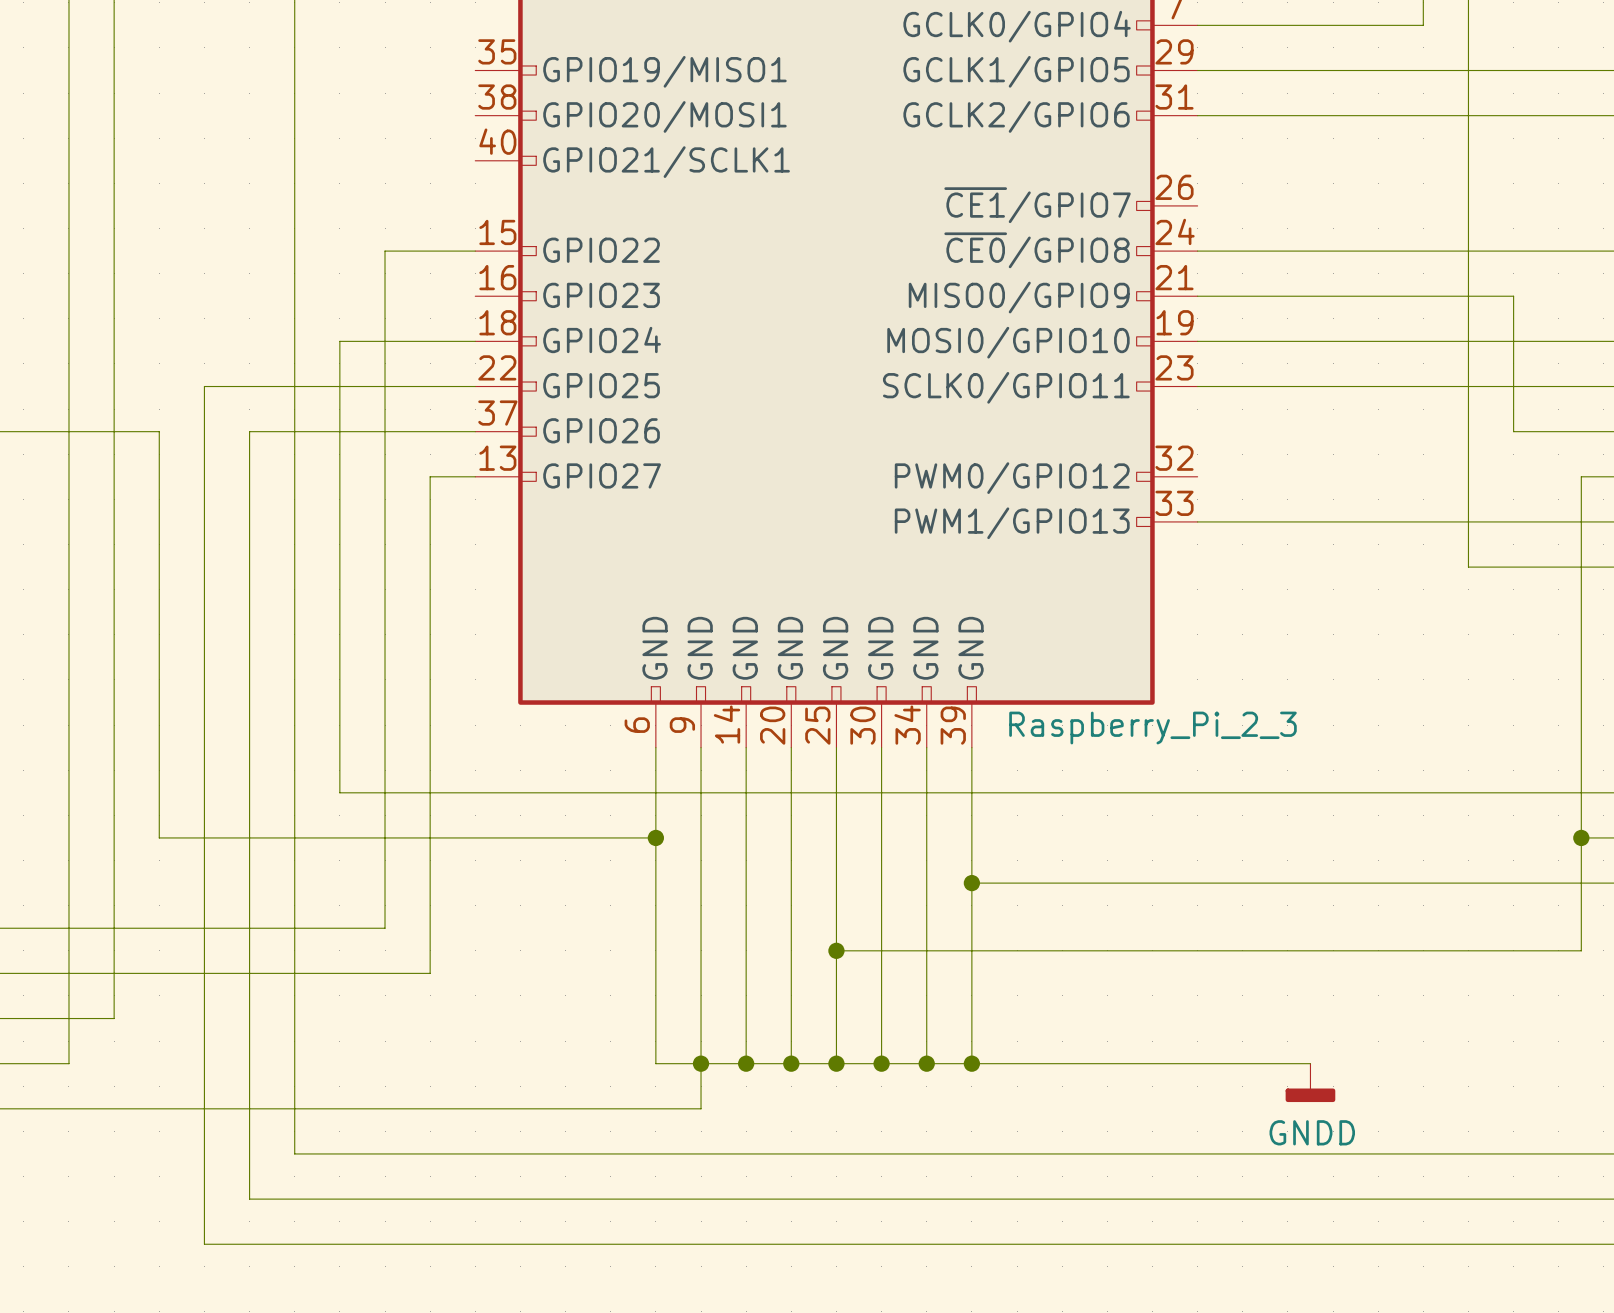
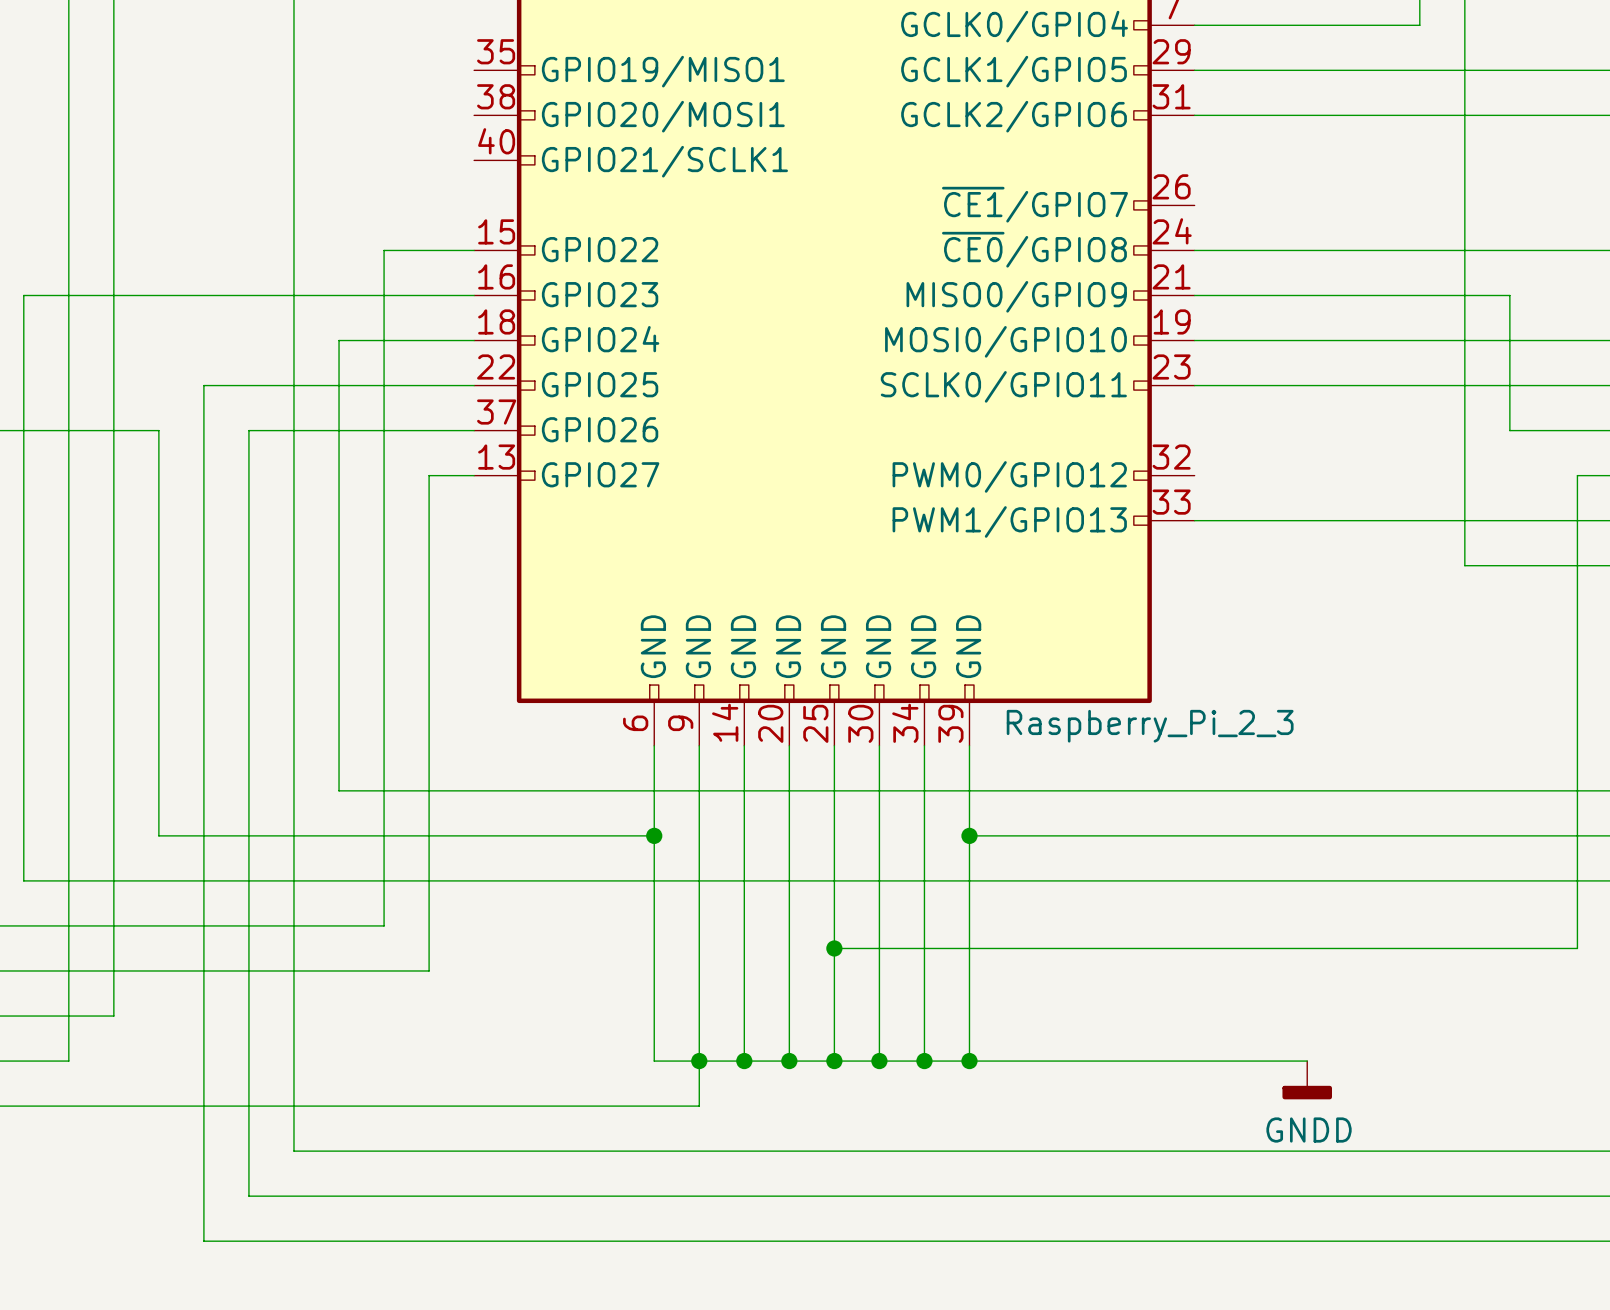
wire: none -> (474, 295) (23, 295) (23, 880) (969, 880)
wire: none -> (969, 835) (1577, 835)
junction: (1581, 837) -> none
junction position: (971, 883) -> (969, 835)

